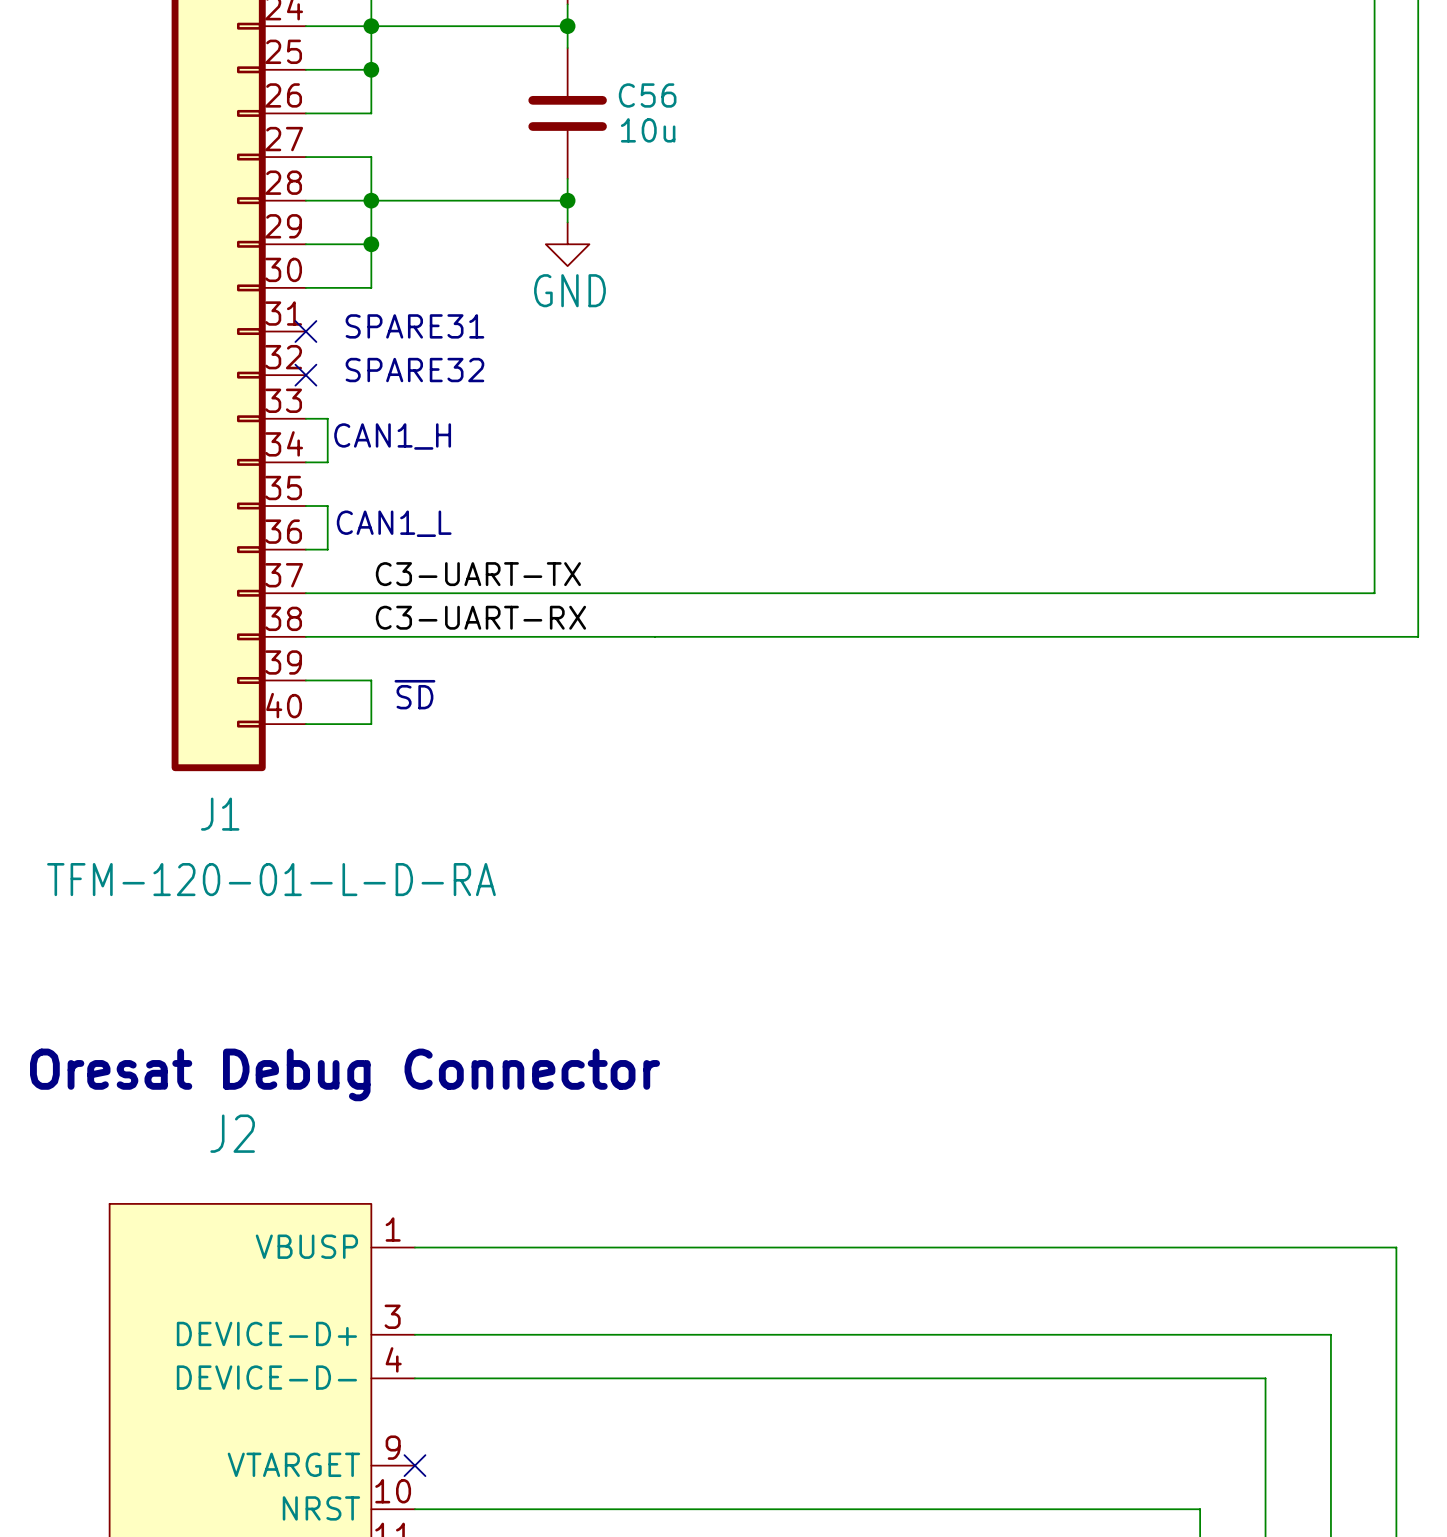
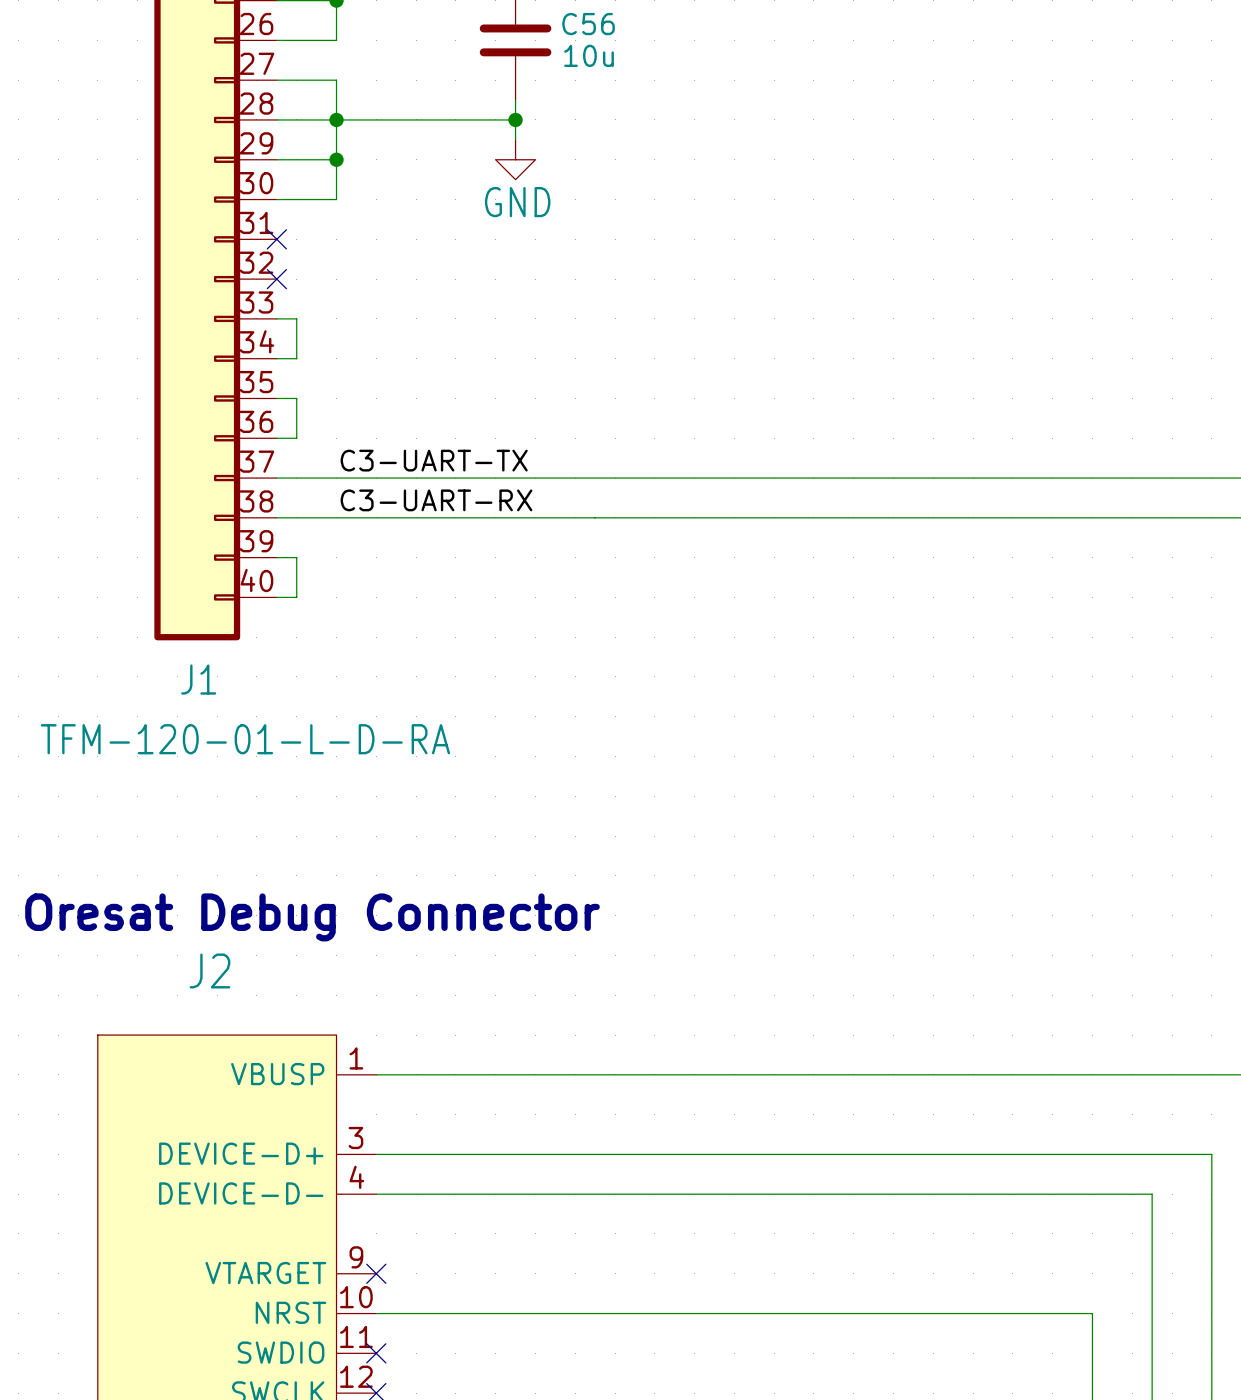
text: SPARE31 (414, 326) -> none
text: SPARE32 (414, 370) -> none
text: CAN1_H (392, 436) -> none
text: CAN1_L (394, 523) -> none
wire: (327, 680) (371, 680) (371, 724) (327, 724) -> (296, 557) (296, 597)
text: ~{SD} (414, 694) -> none

